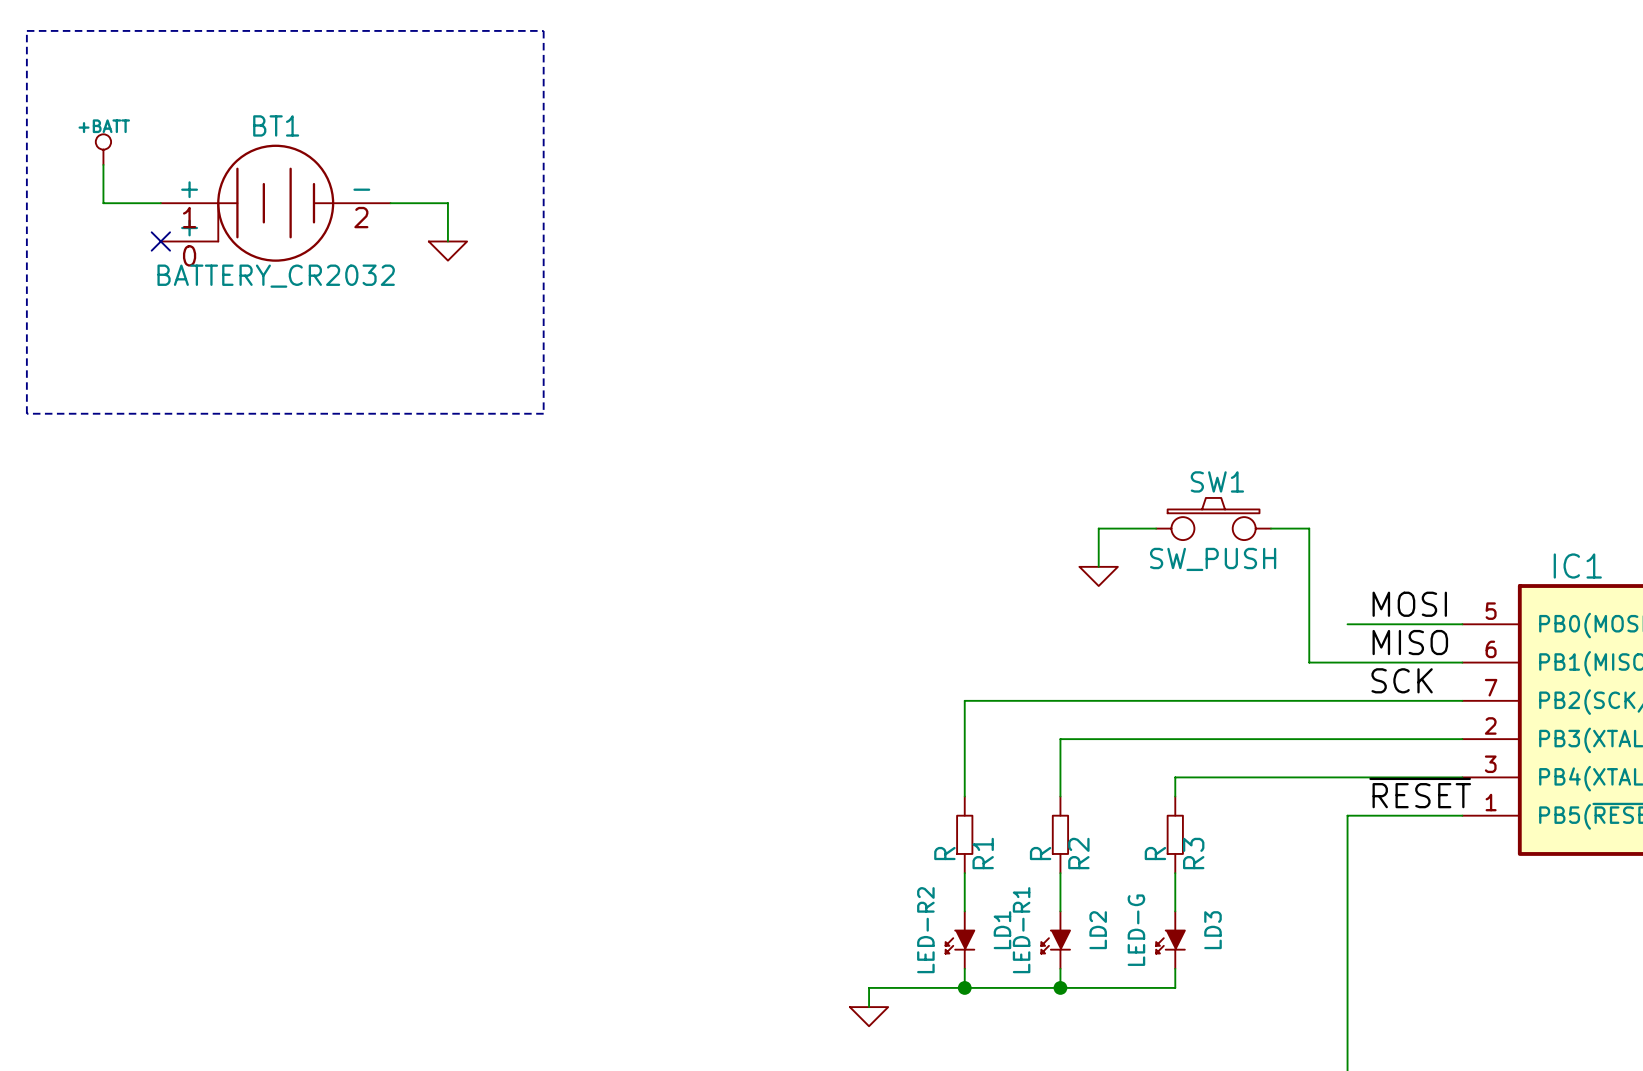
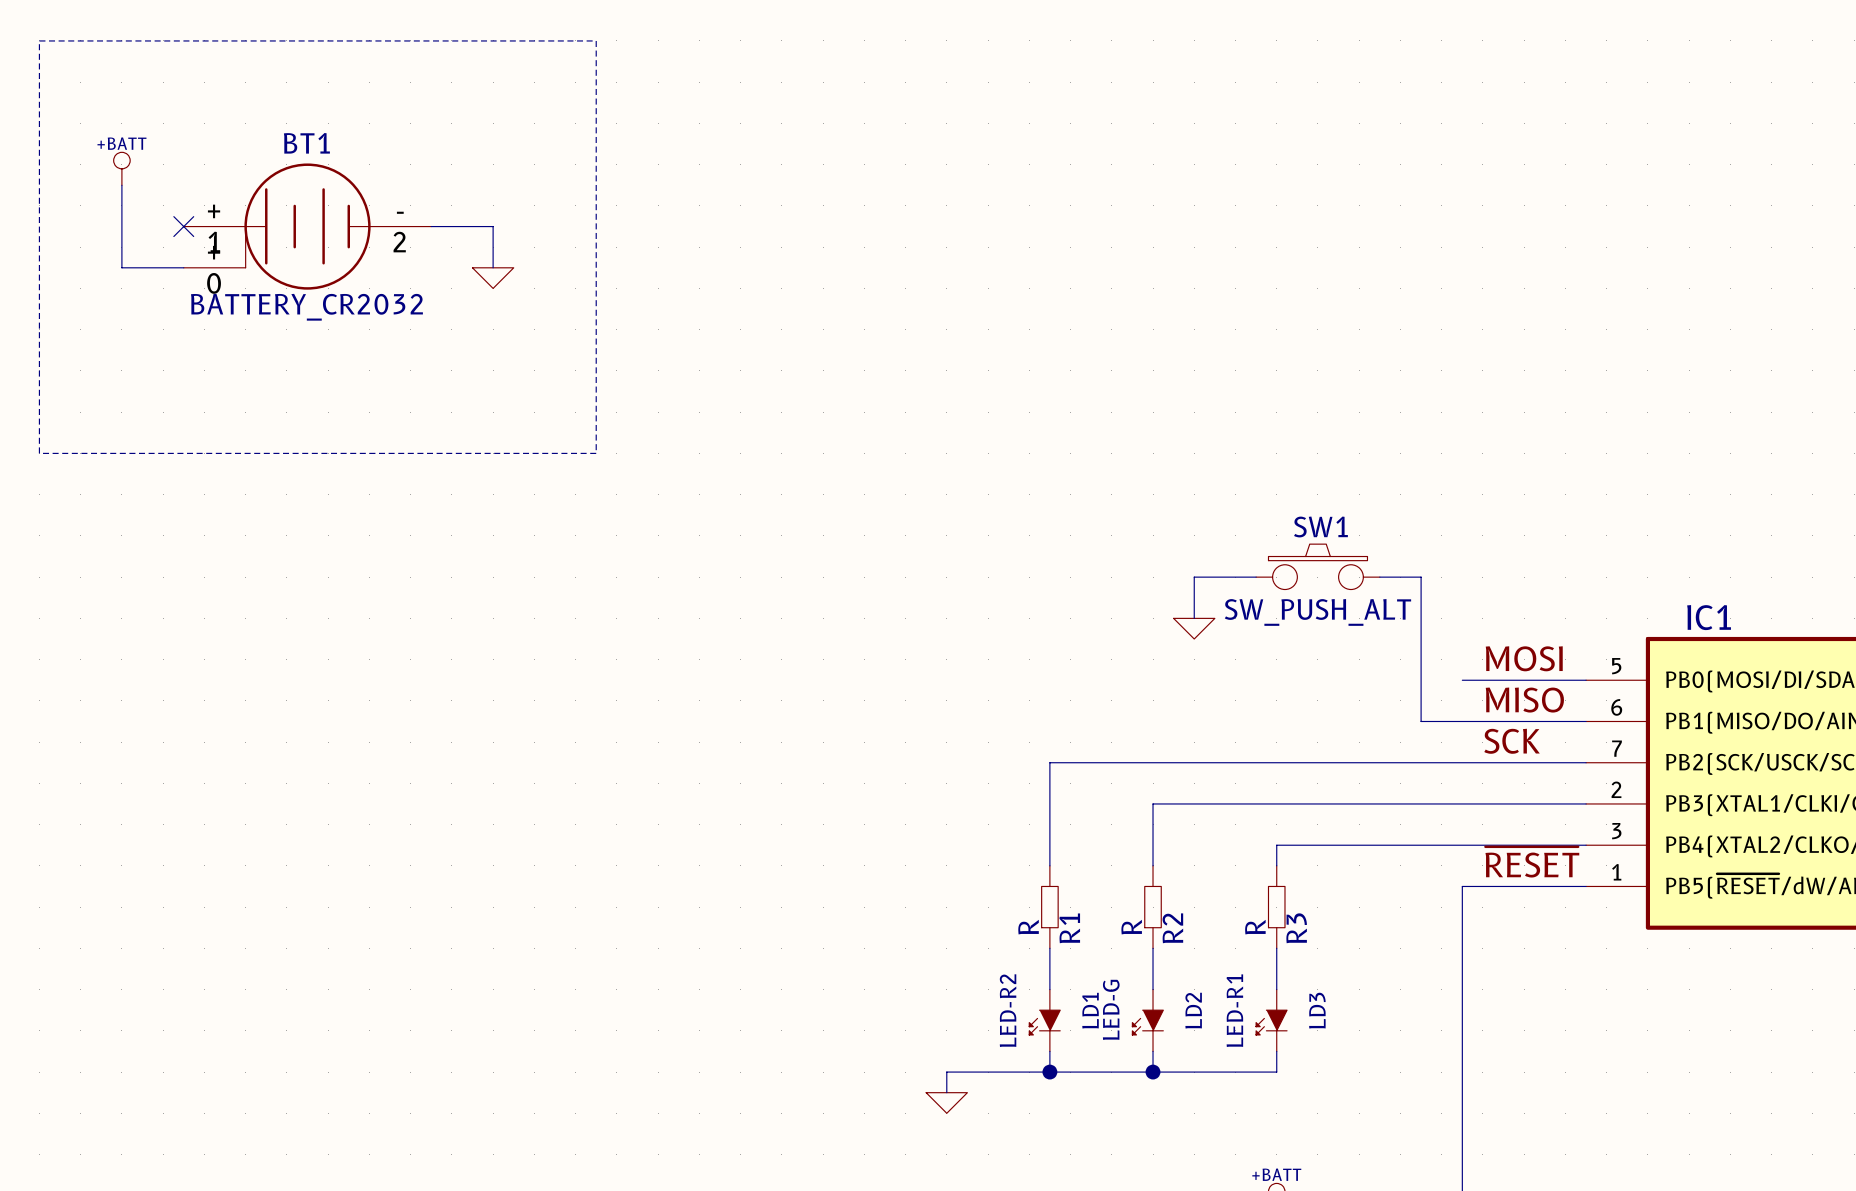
wire: (103, 203) (160, 203) -> (121, 226) (121, 267) (183, 267)
no-connect mark position: (160, 241) -> (183, 226)
SW1 value: SW_PUSH (1213, 559) -> SW_PUSH_ALT (1317, 612)
LD2 value: LED-R1 (1021, 930) -> LED-G (1111, 1009)
LD3 value: LED-G (1136, 930) -> LED-R1 (1234, 1010)

